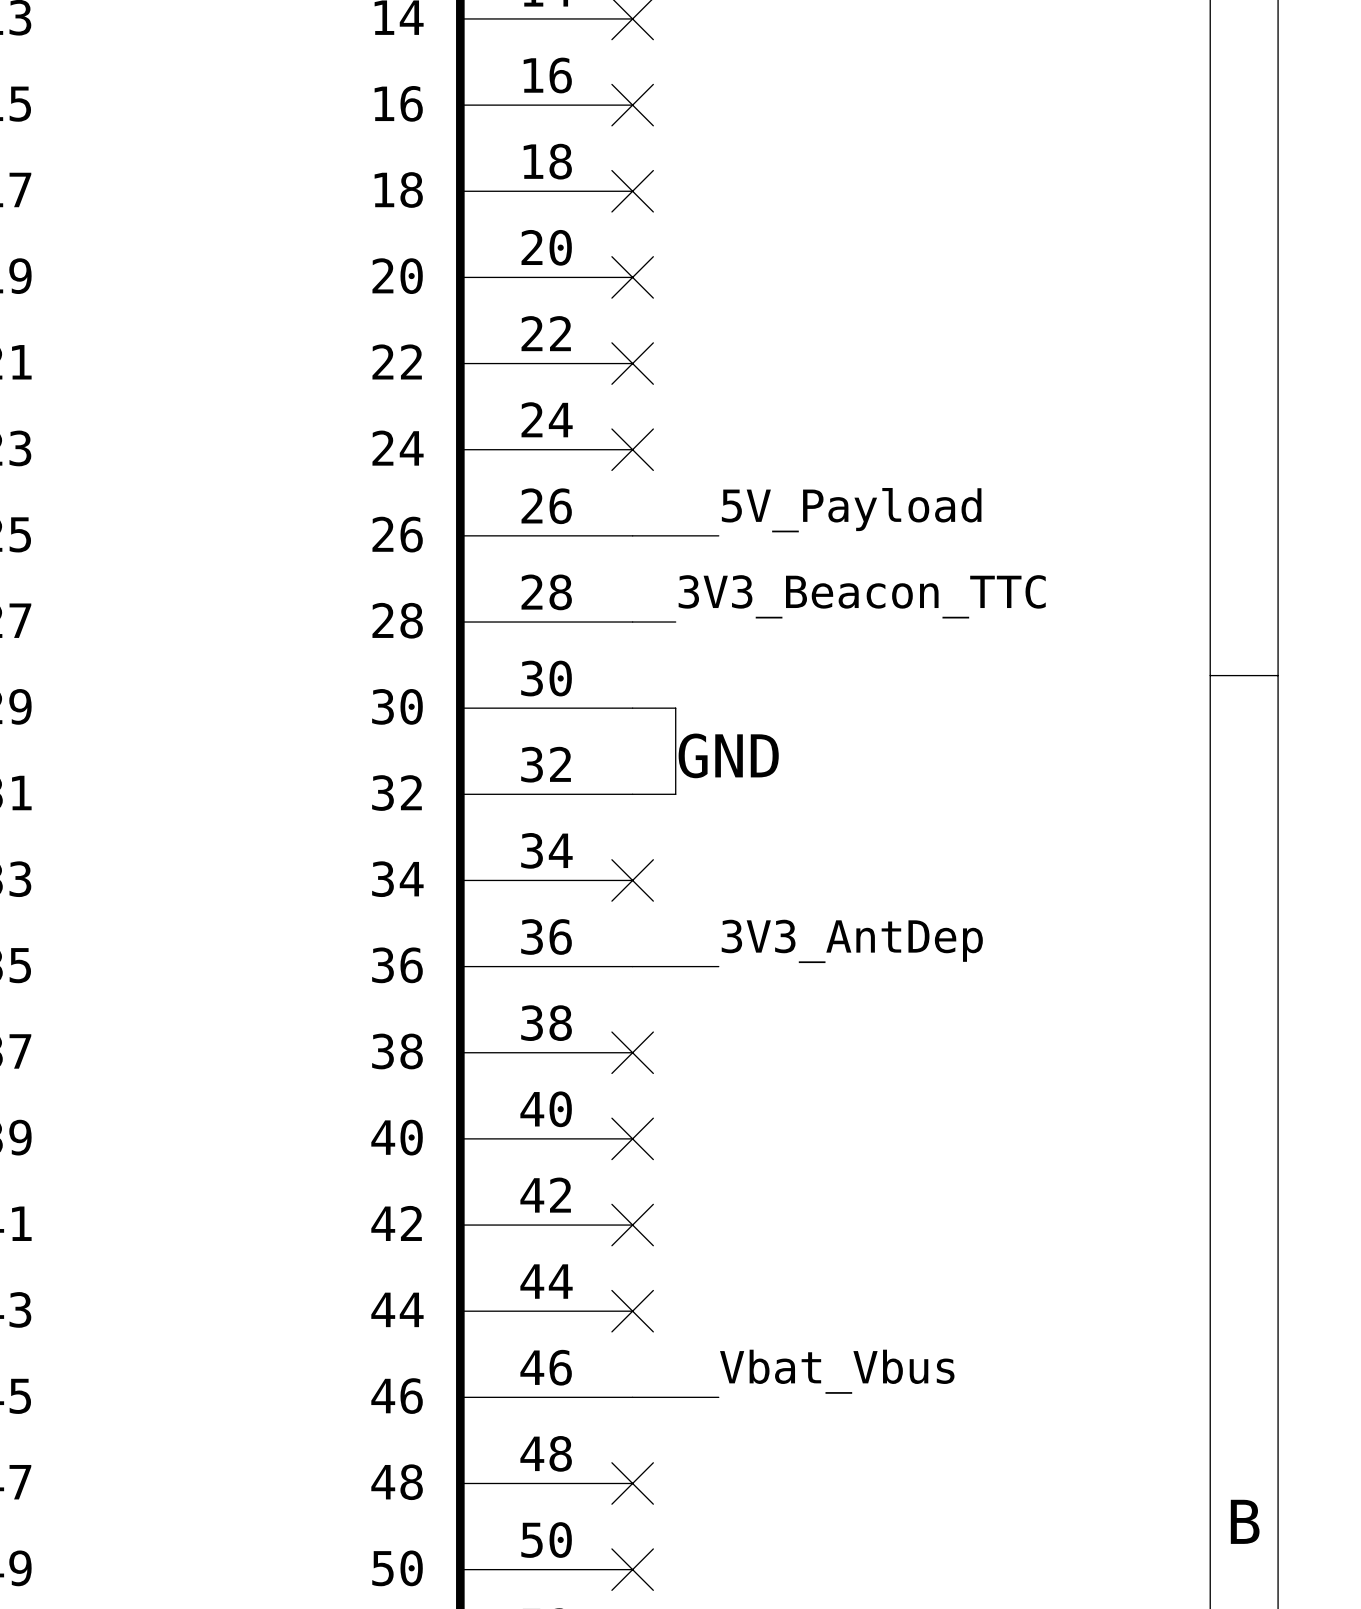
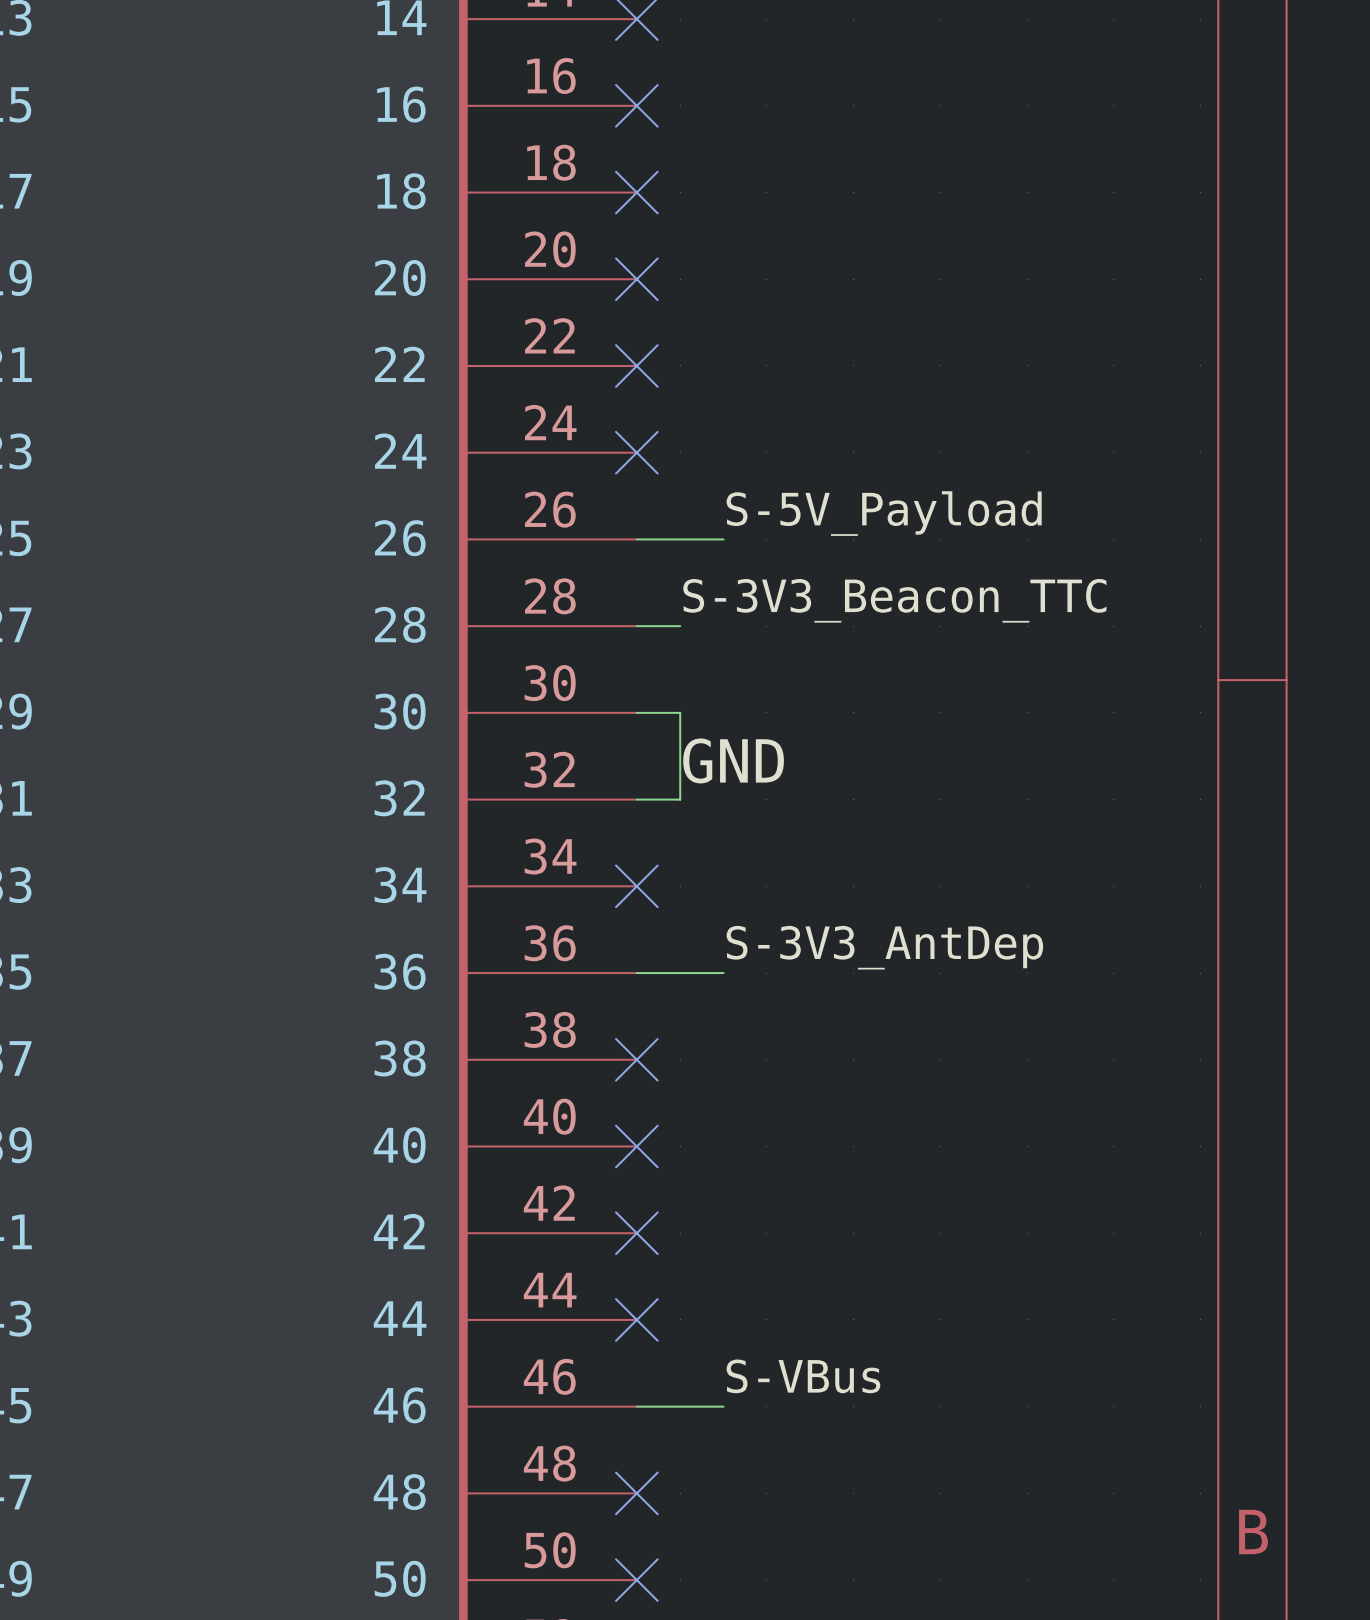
label: 5V_Payload (851, 510) -> S-5V_Payload (884, 513)
label: 3V3_Beacon_TTC (862, 596) -> S-3V3_Beacon_TTC (894, 600)
label: 3V3_AntDep (852, 941) -> S-3V3_AntDep (884, 947)
label: Vbat_Vbus (837, 1371) -> S-VBus (803, 1376)

